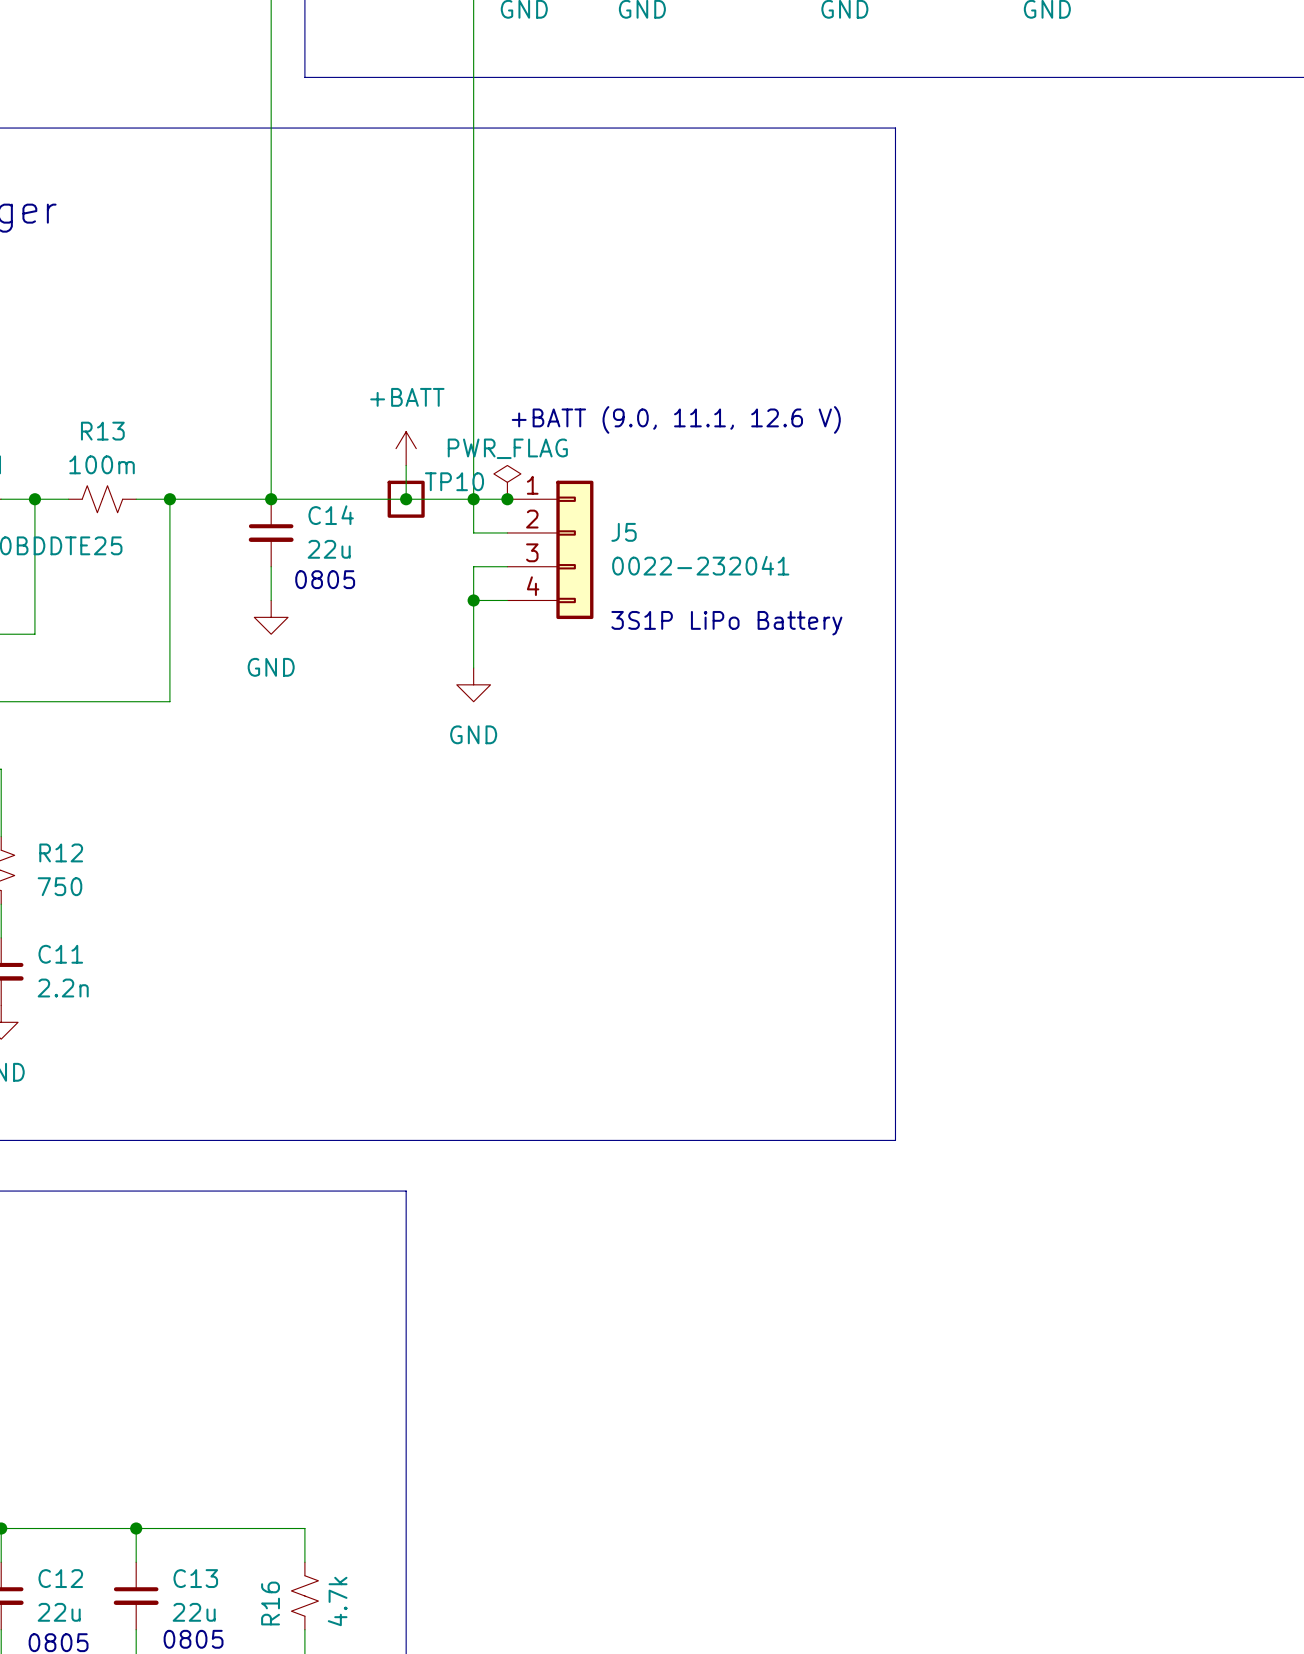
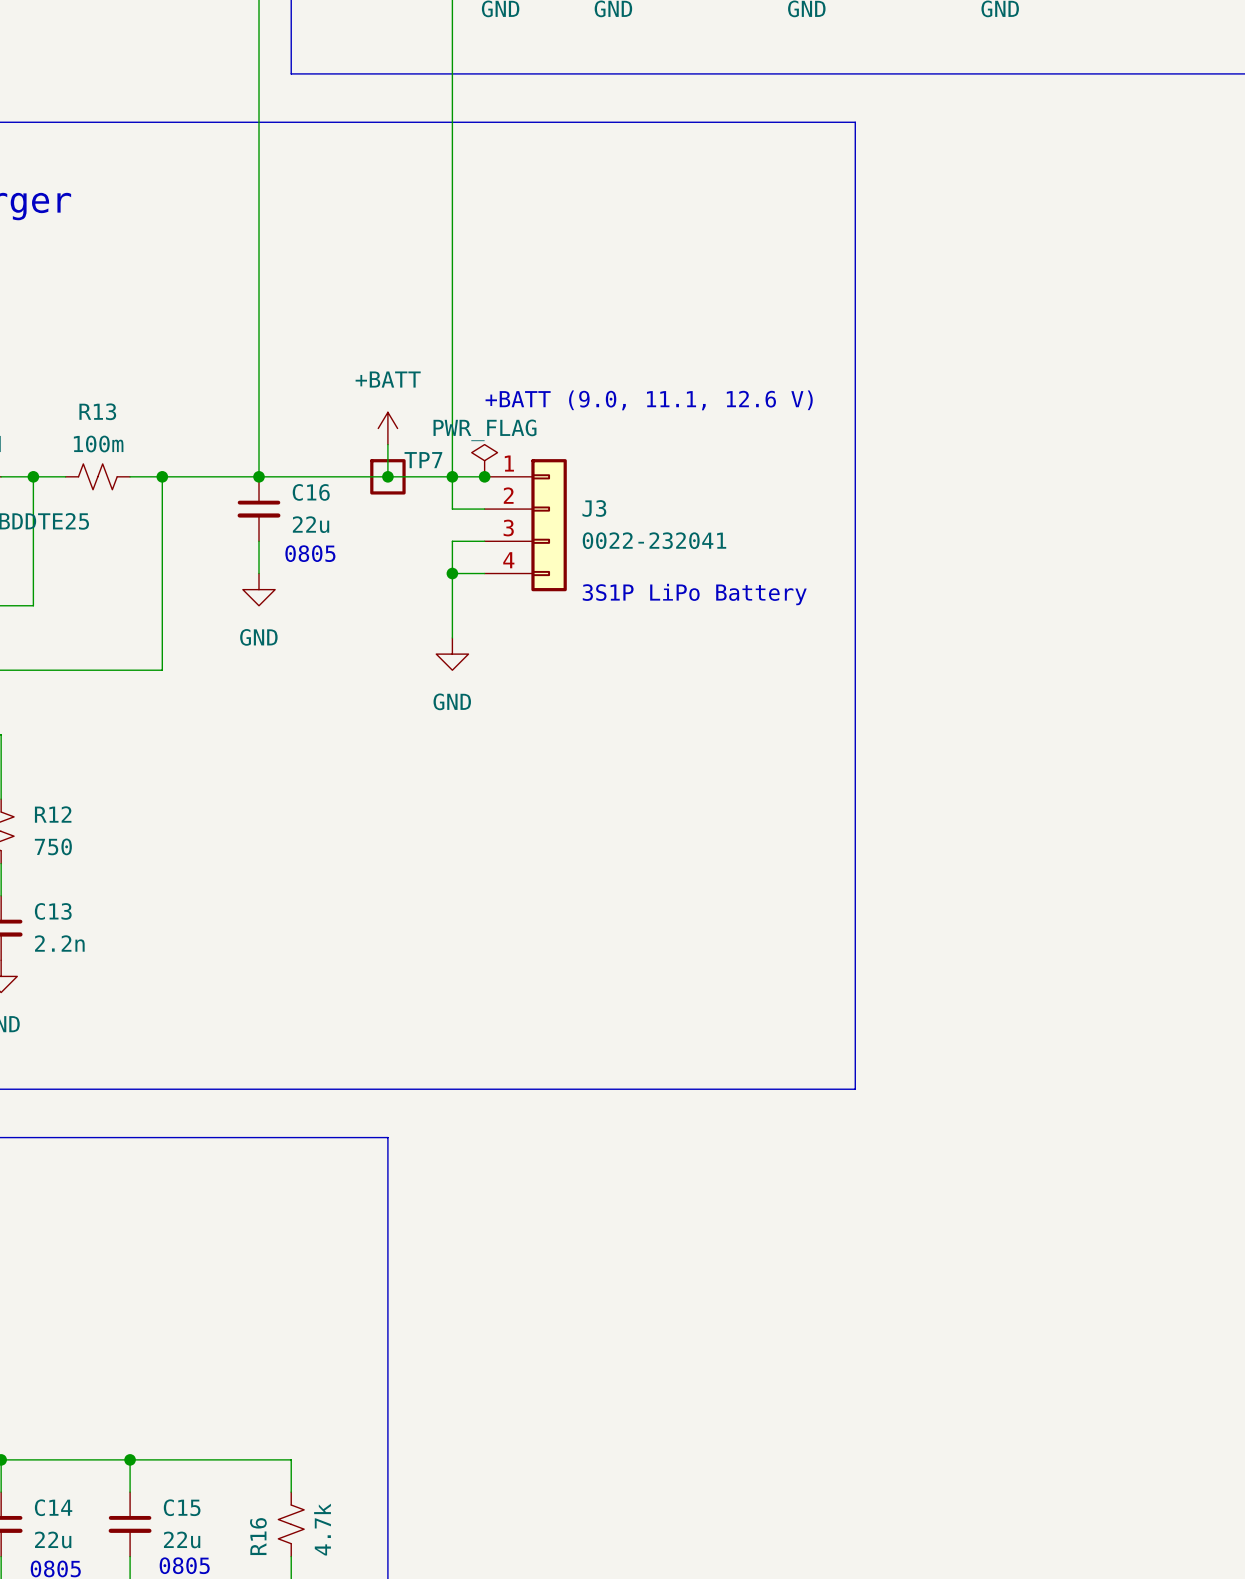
TP10 name: TP10 (454, 481) -> TP7 (423, 460)
C14 name: C14 (331, 515) -> C16 (311, 492)
J5 name: J5 (624, 532) -> J3 (594, 508)
C11 name: C11 (60, 954) -> C13 (53, 911)
C12 name: C12 (60, 1578) -> C14 (53, 1507)
C13 name: C13 (195, 1578) -> C15 (182, 1507)

